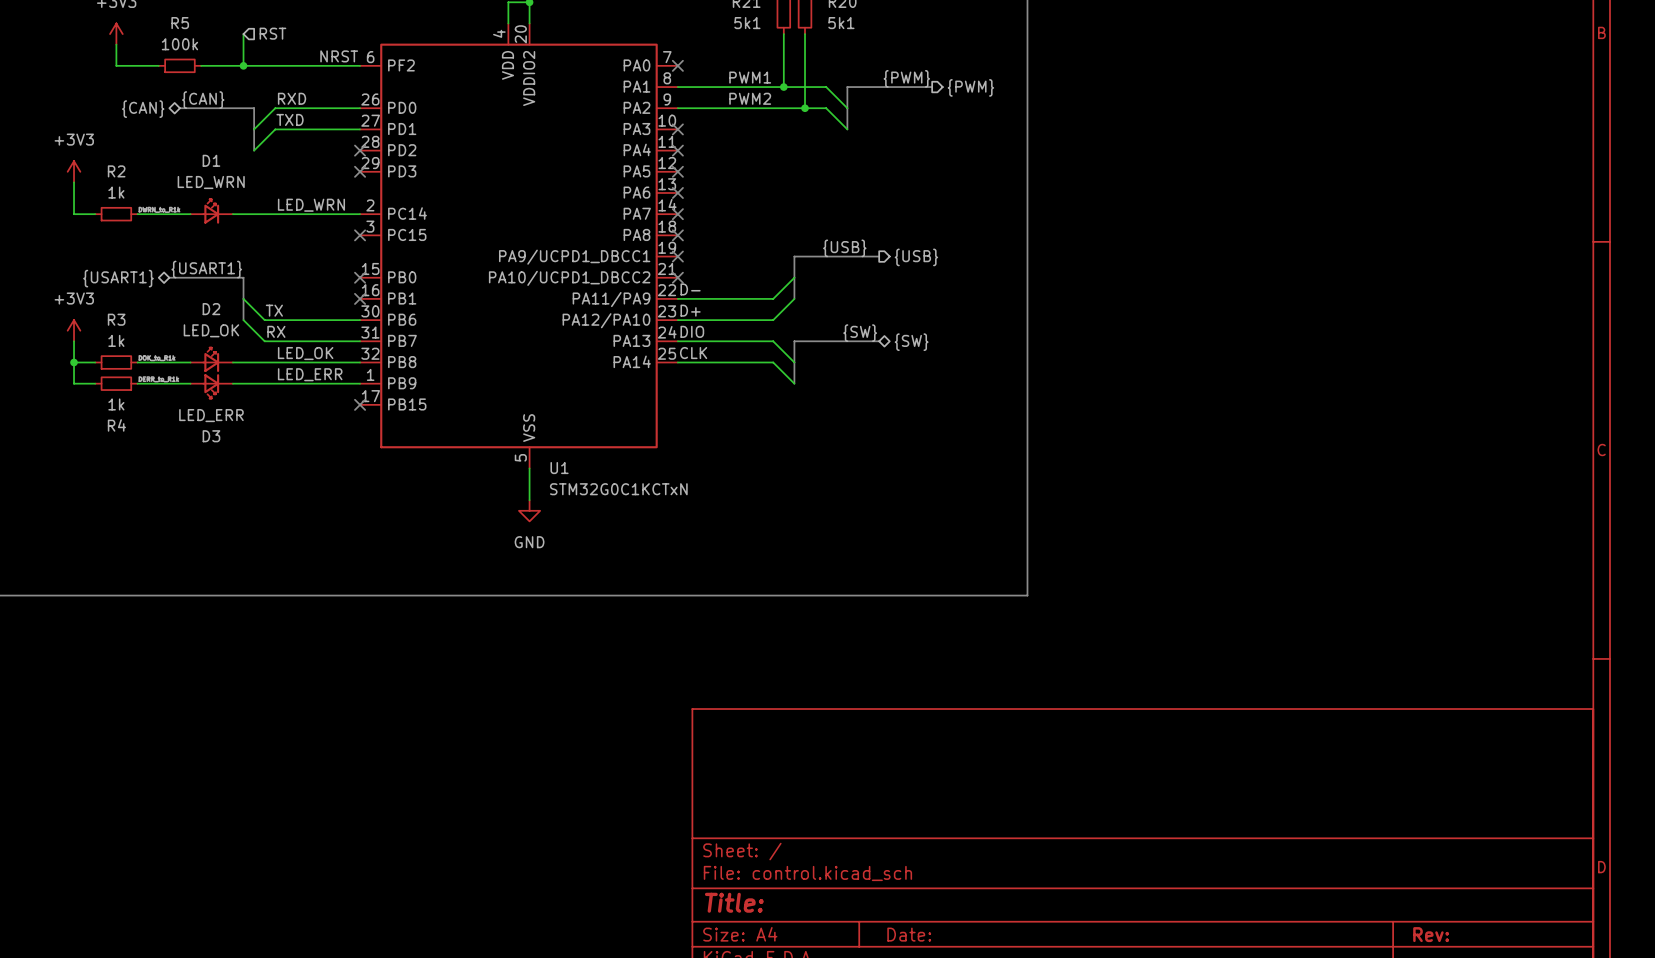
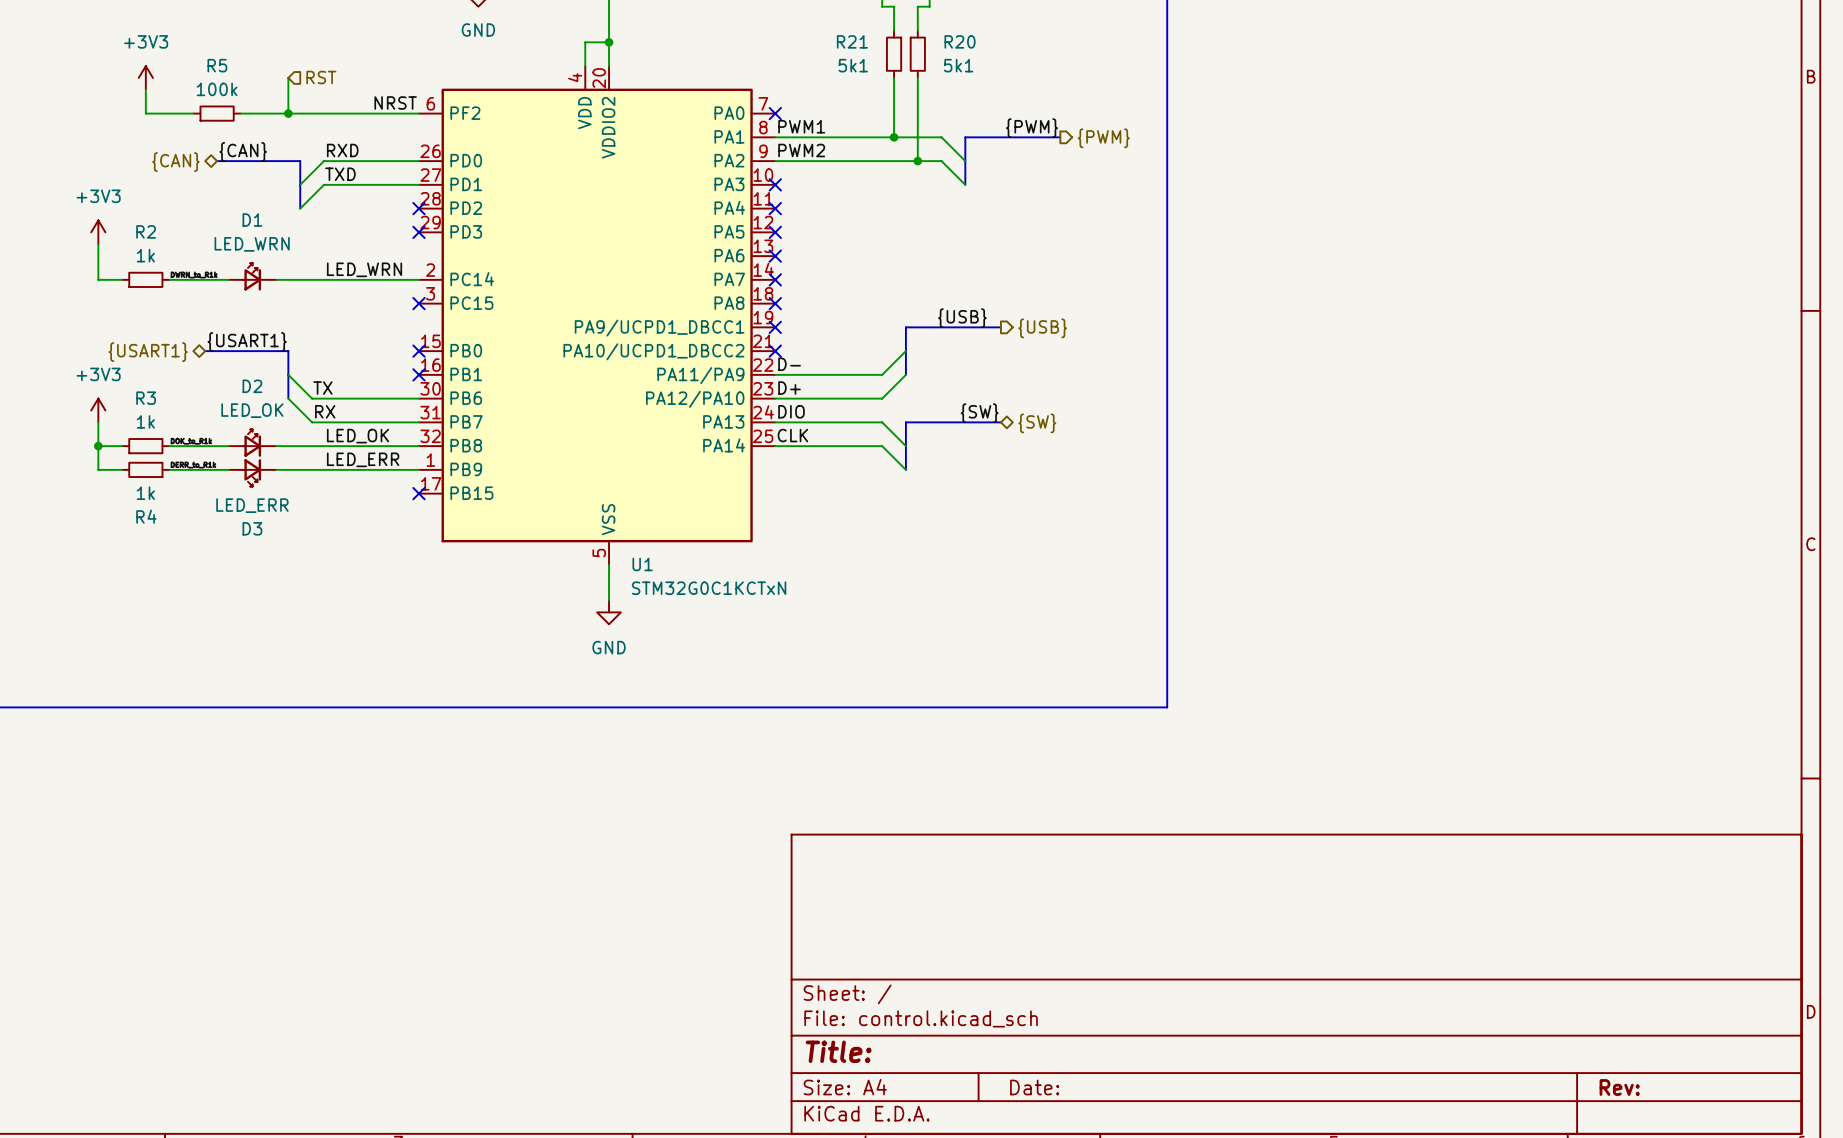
label position: PWM1 (750, 77) -> PWM1 (801, 126)
label position: PWM2 (750, 98) -> PWM2 (801, 150)

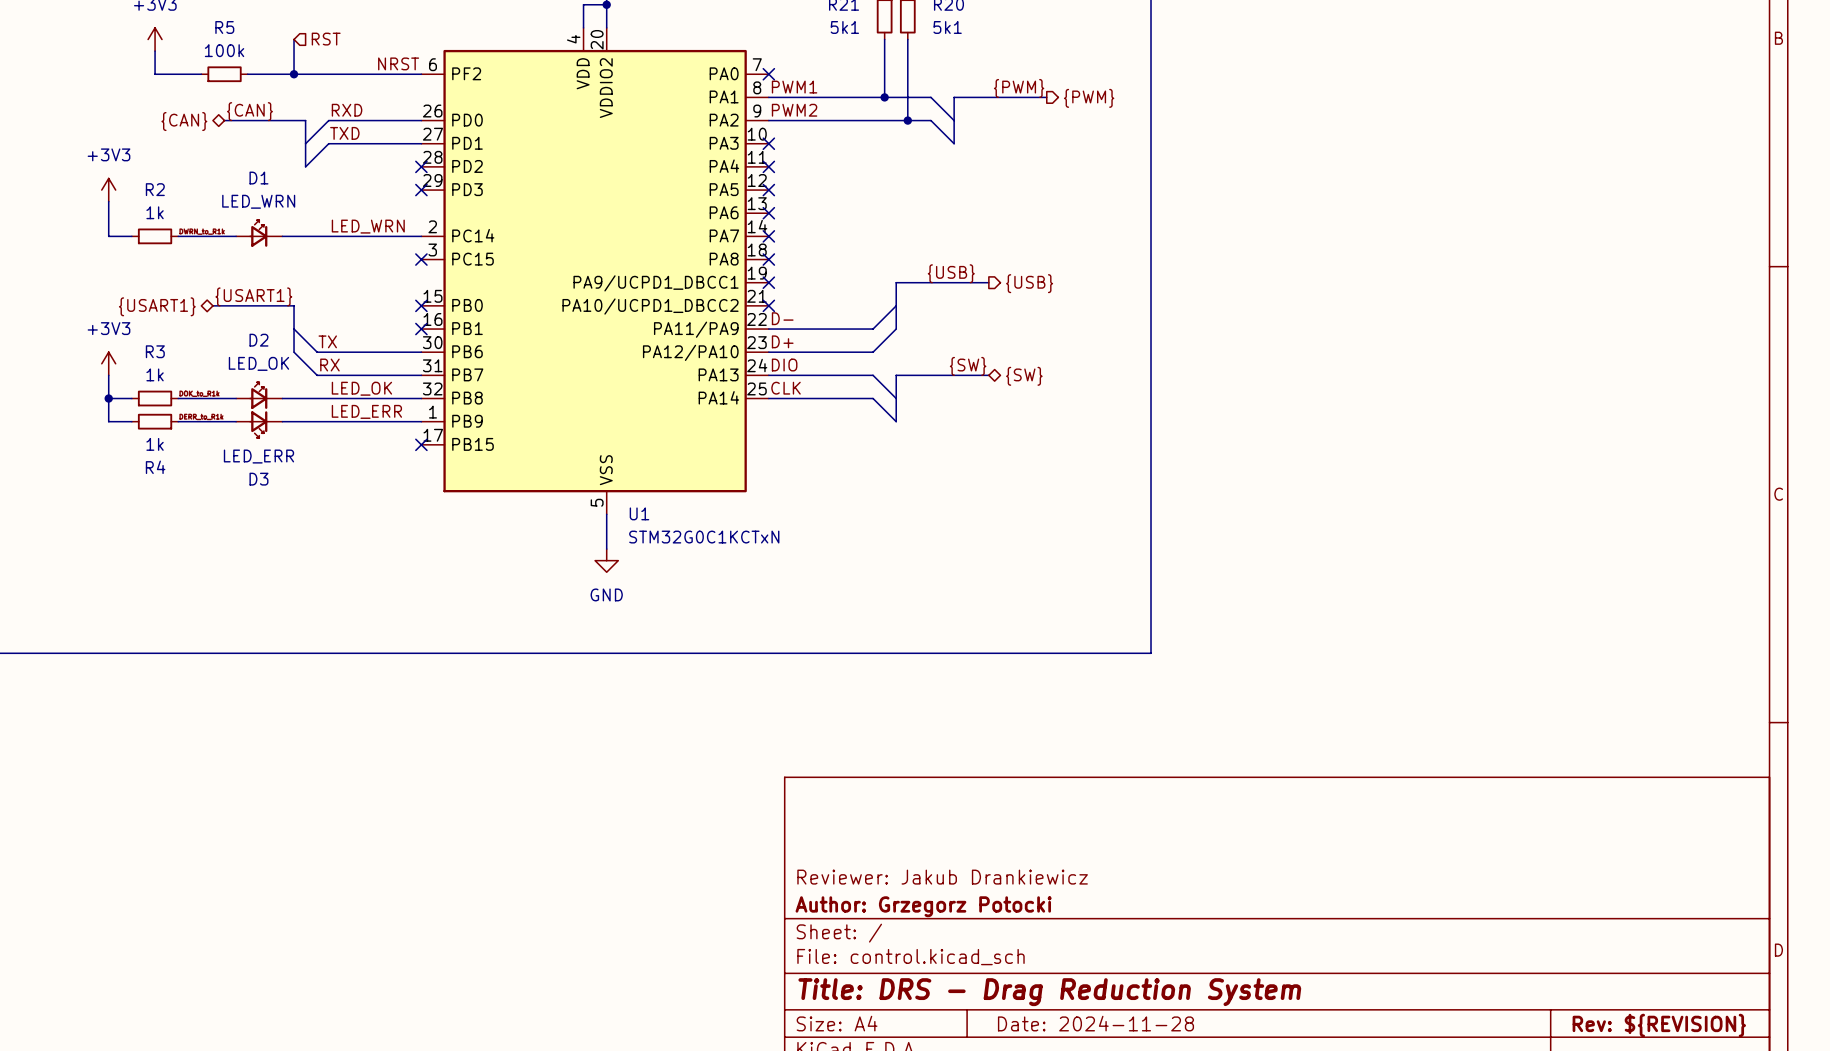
title block: none -> Reviewer: Jakub Drankiewicz (942, 877)
title block: none -> Author: Grzegorz Potocki (923, 906)
title block: Title: (838, 1051) -> Title: DRS - Drag Reduction System (1049, 992)
title block: Date: (1034, 1087) -> Date: 2024-11-28 (1095, 1023)
title block: Rev: (1619, 1087) -> Rev: ${REVISION} (1659, 1025)

